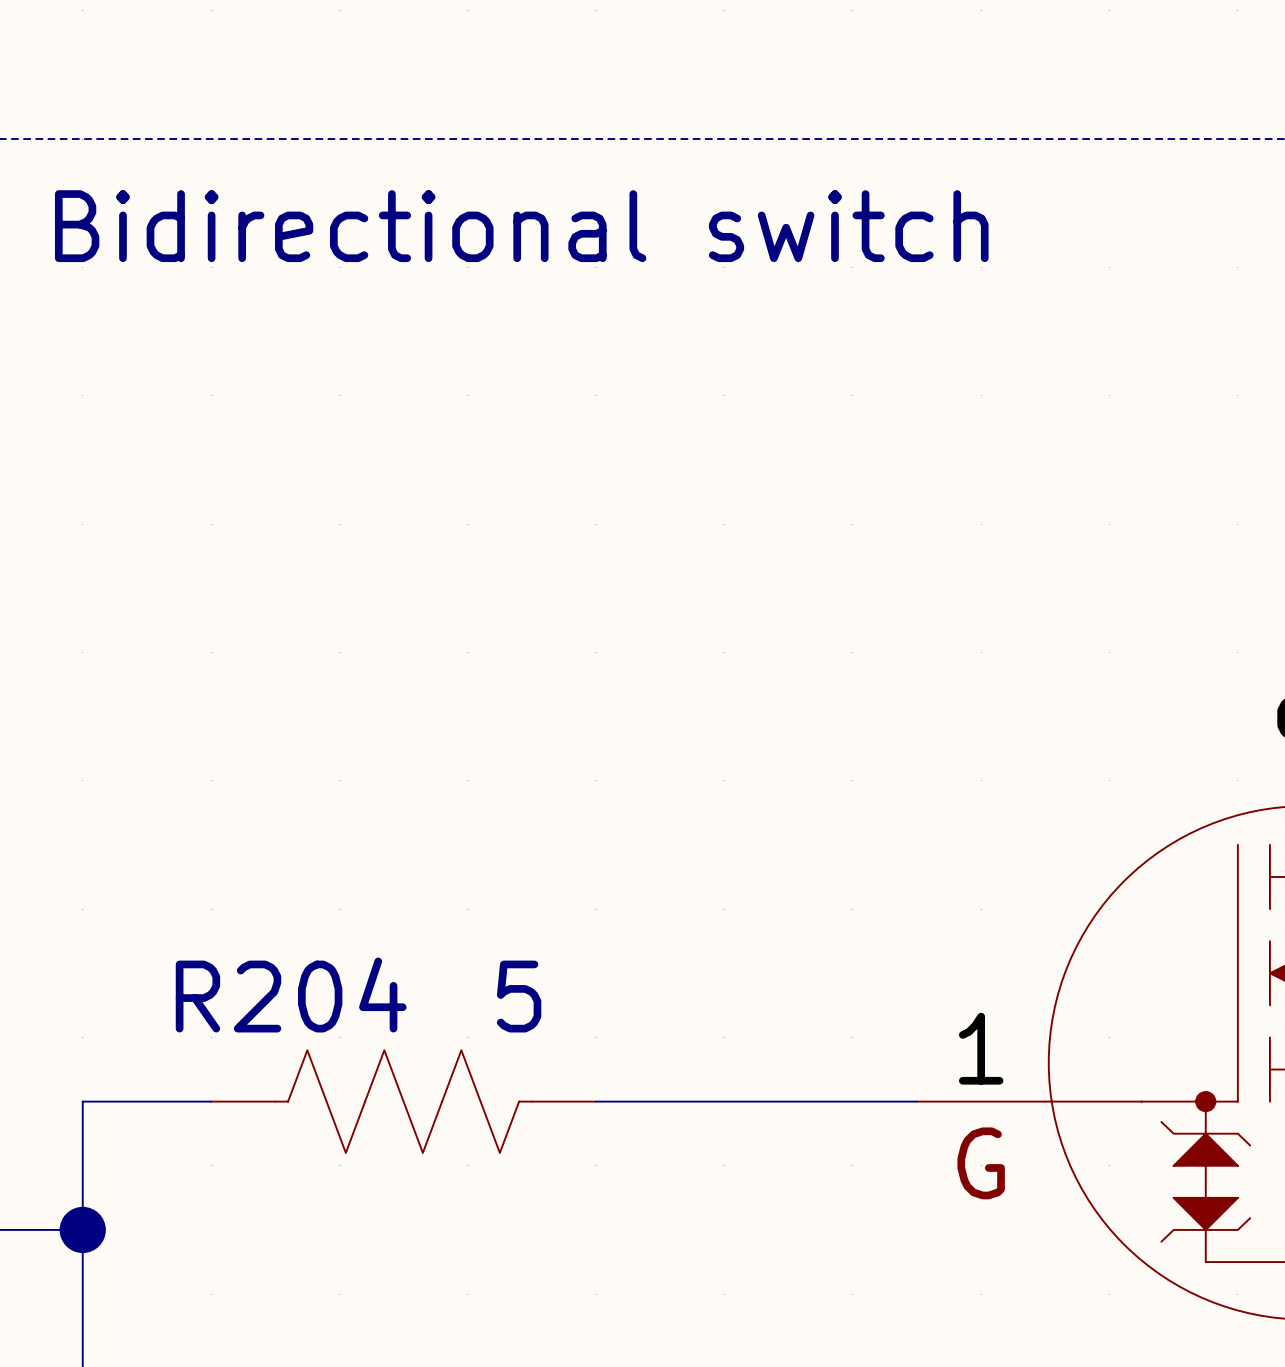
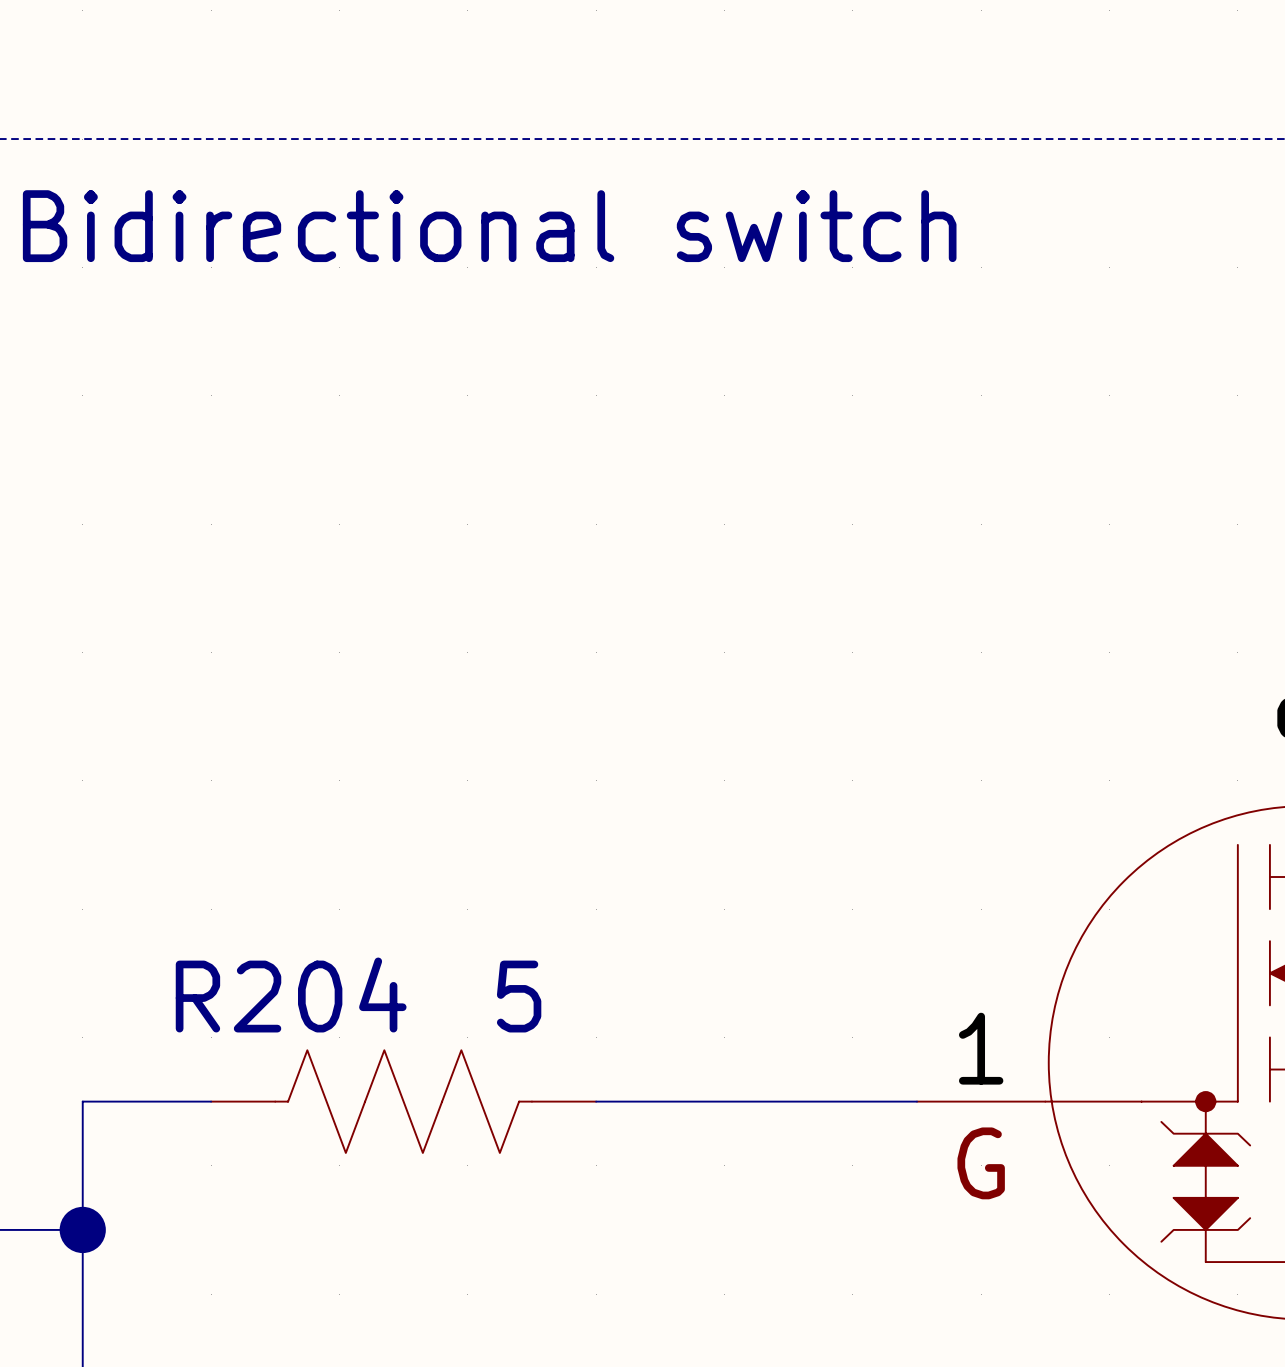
text position: Bidirectional switch (521, 226) -> Bidirectional switch (489, 226)

